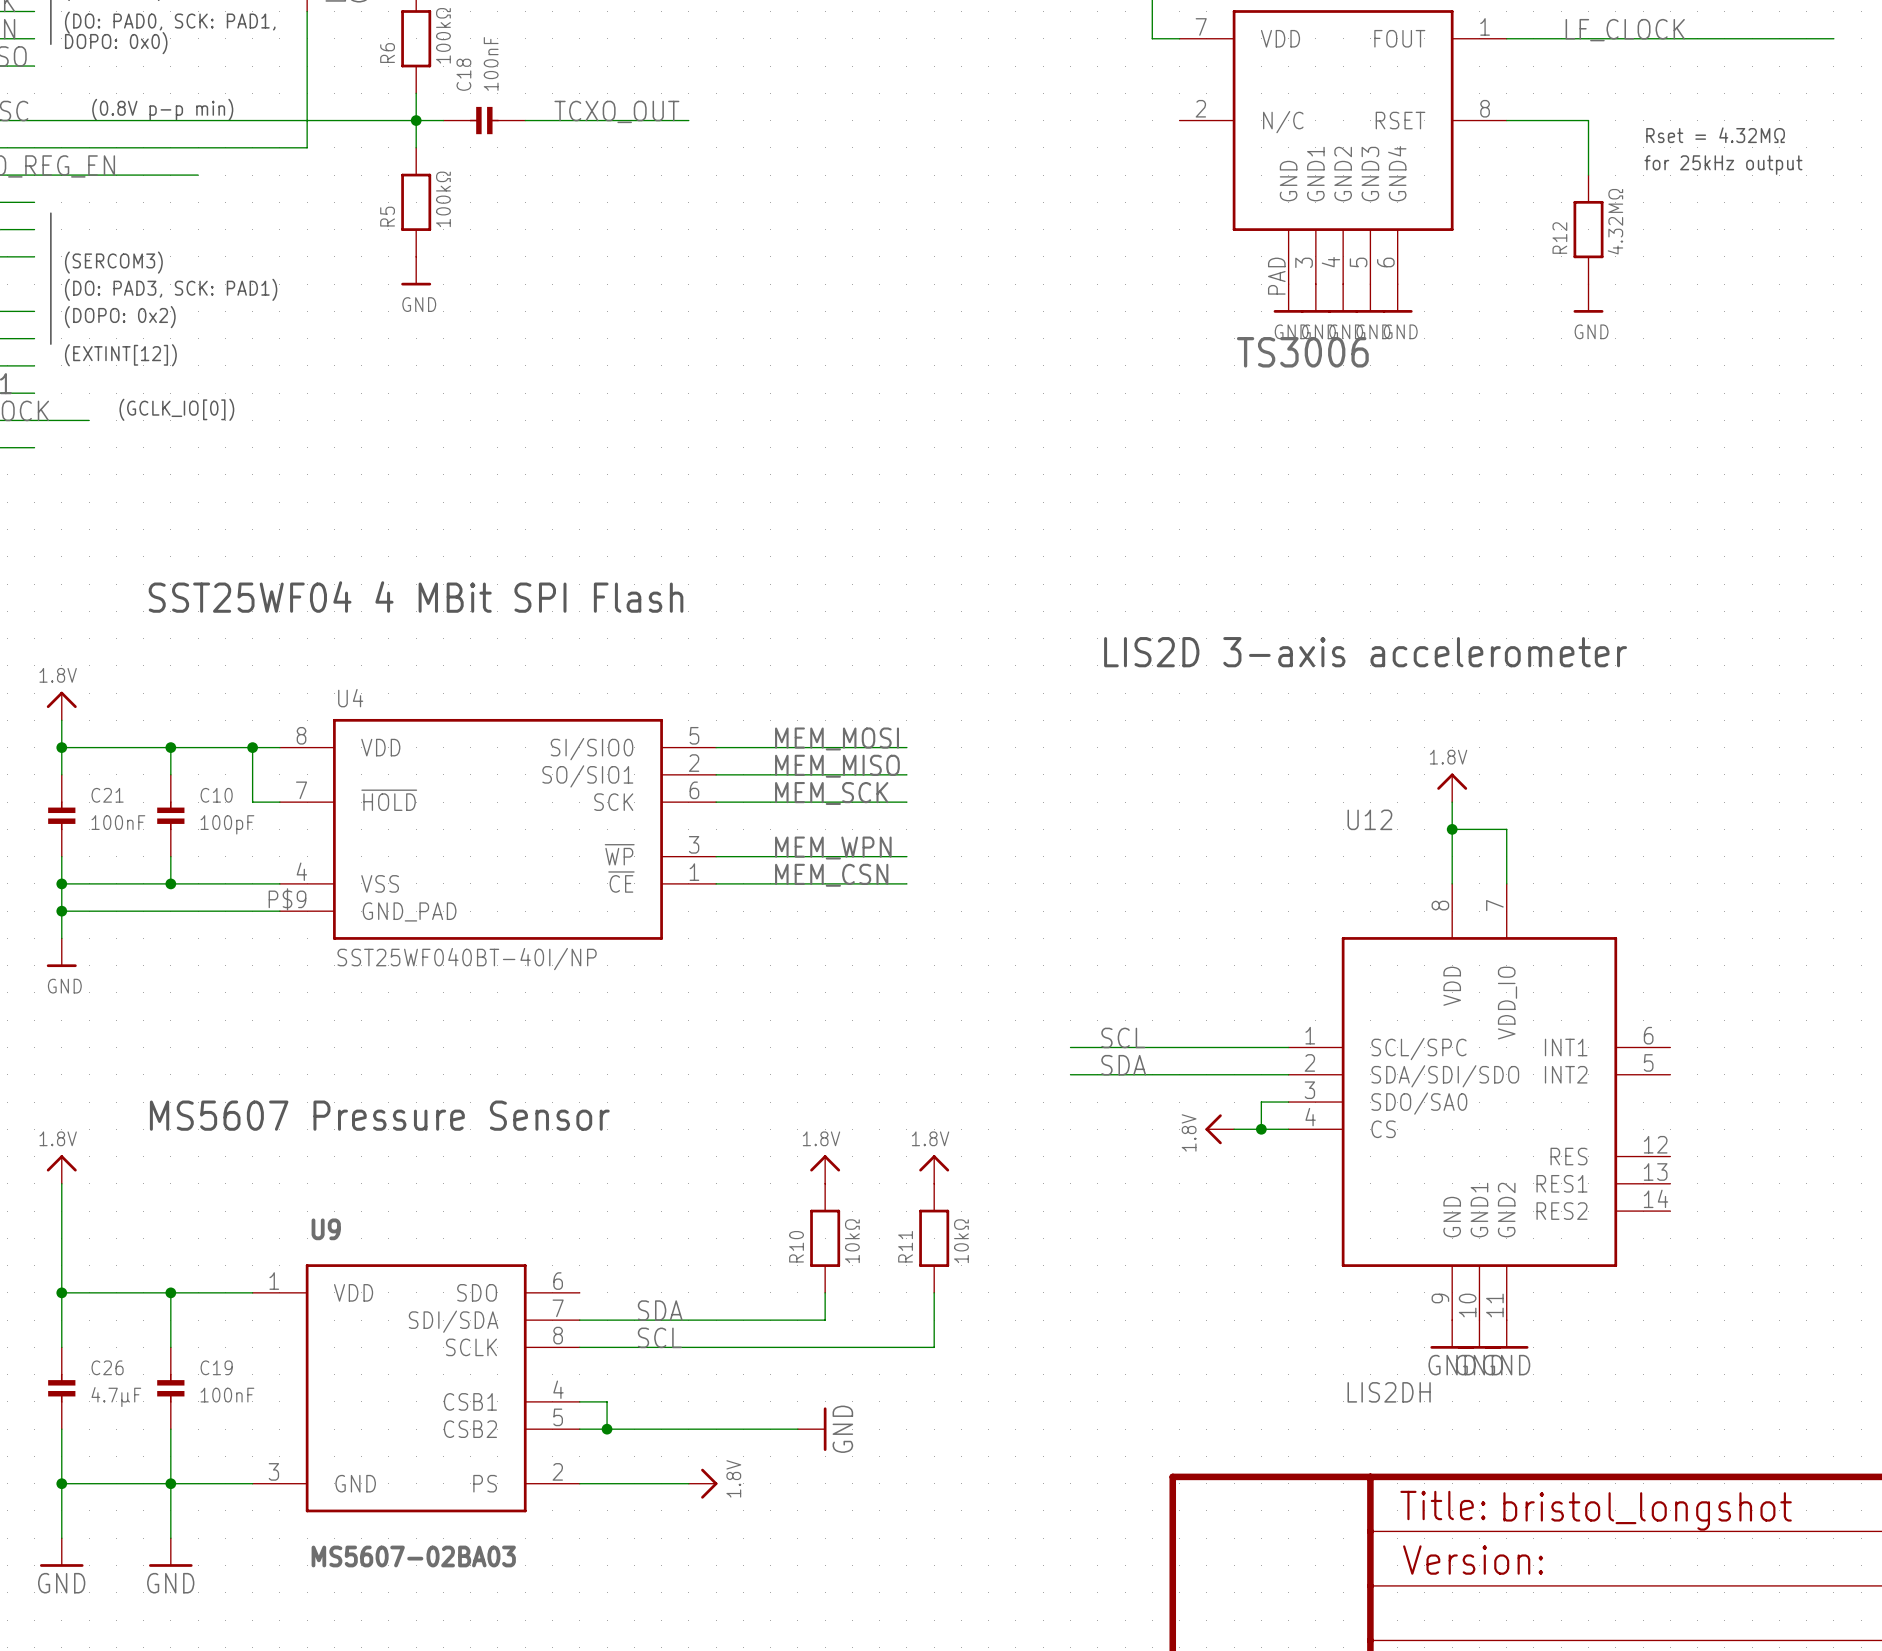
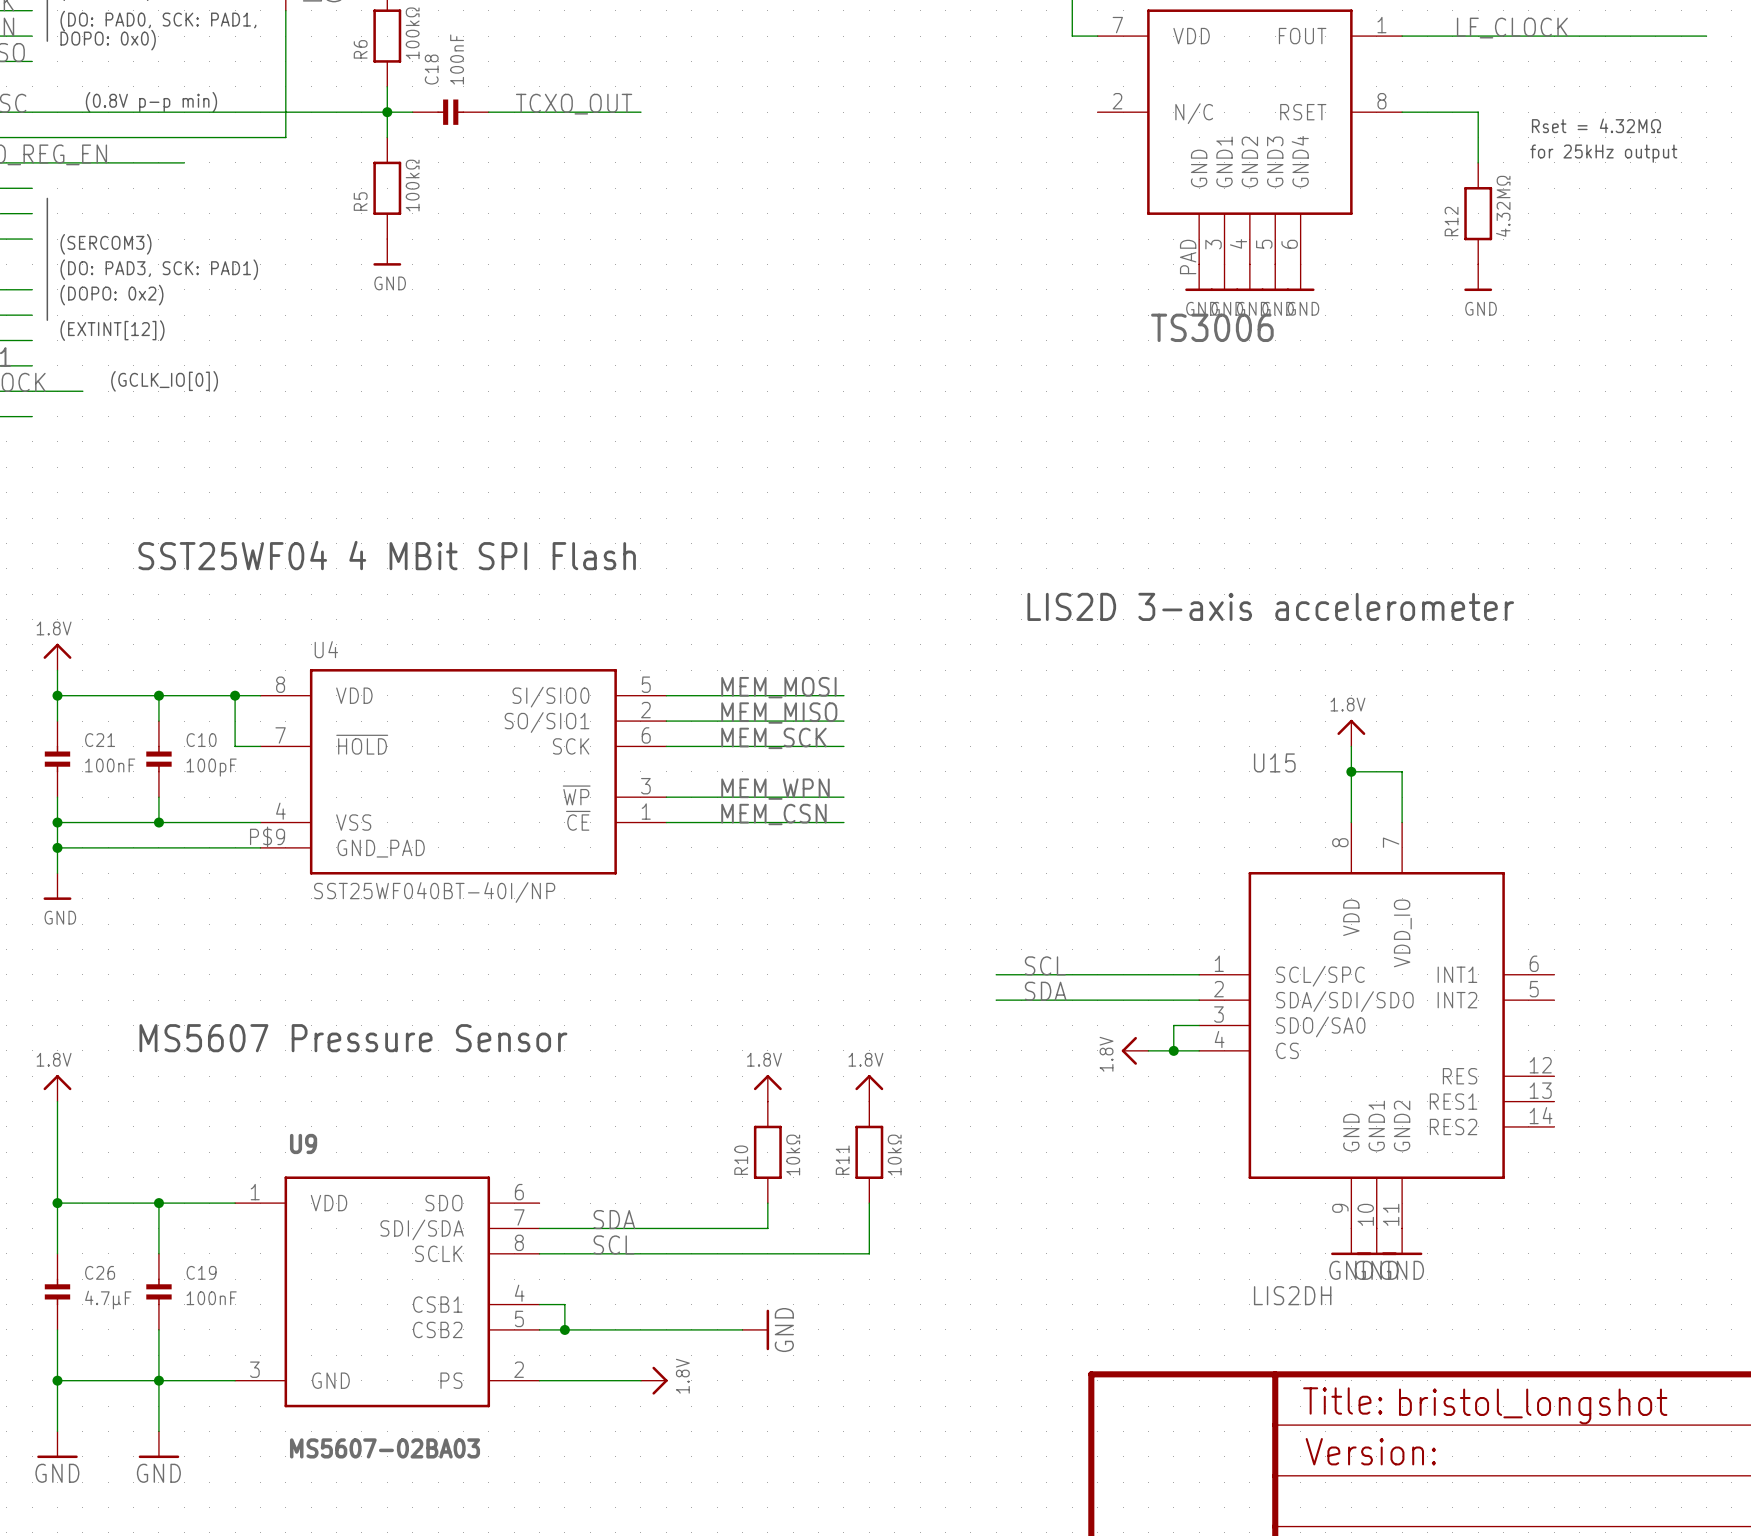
U12 name: U12 (1369, 819) -> U15 (1274, 762)

